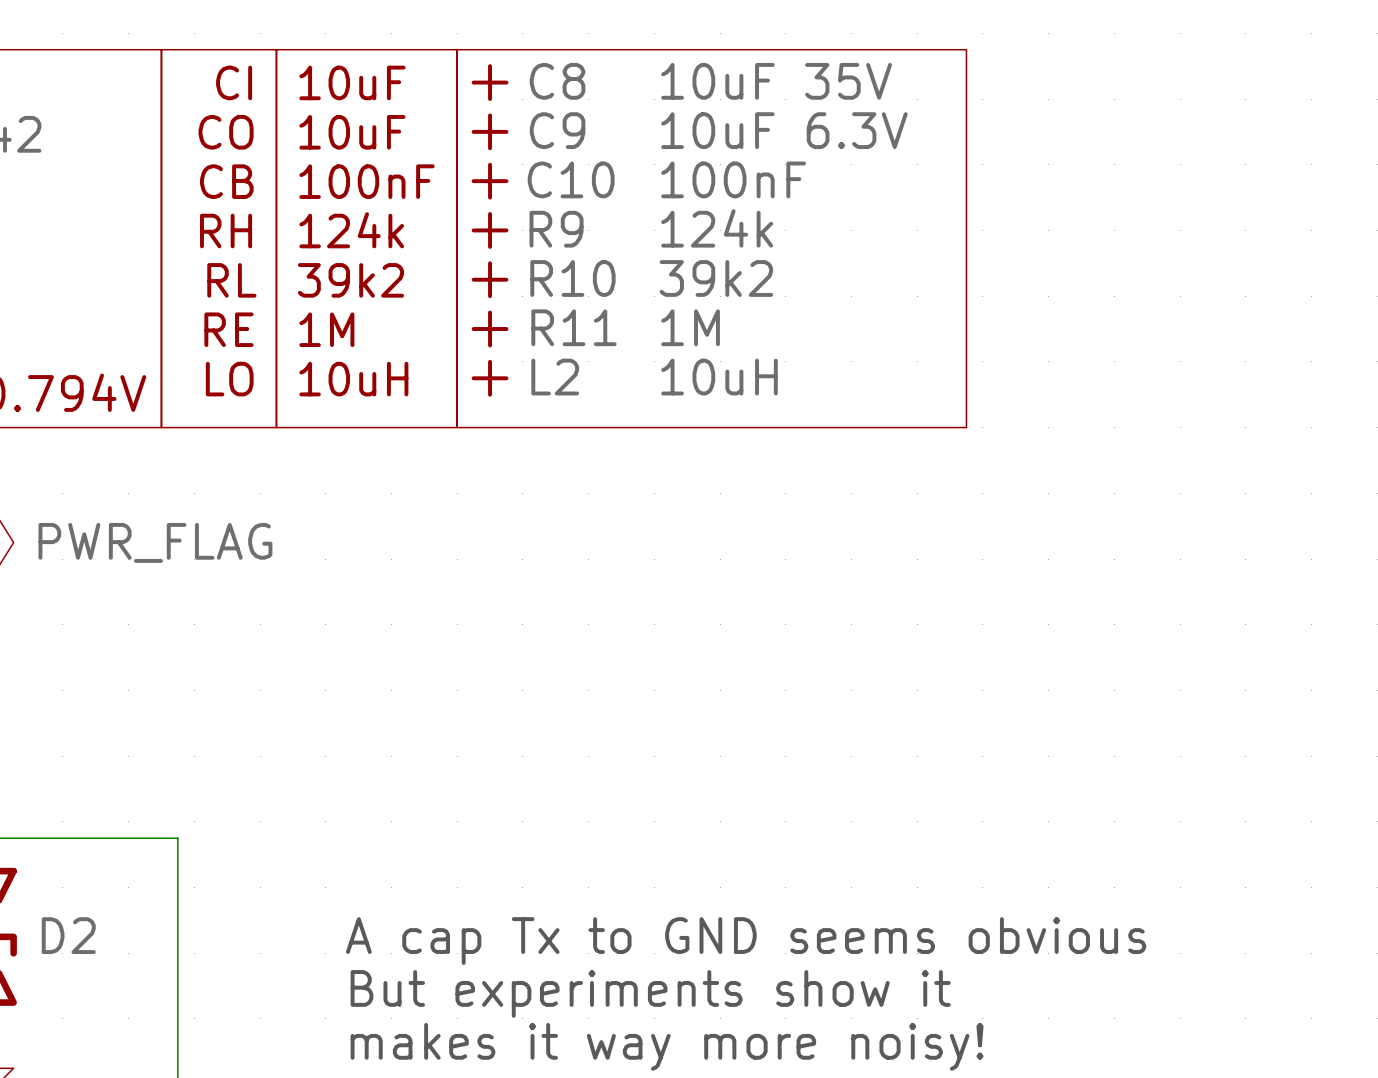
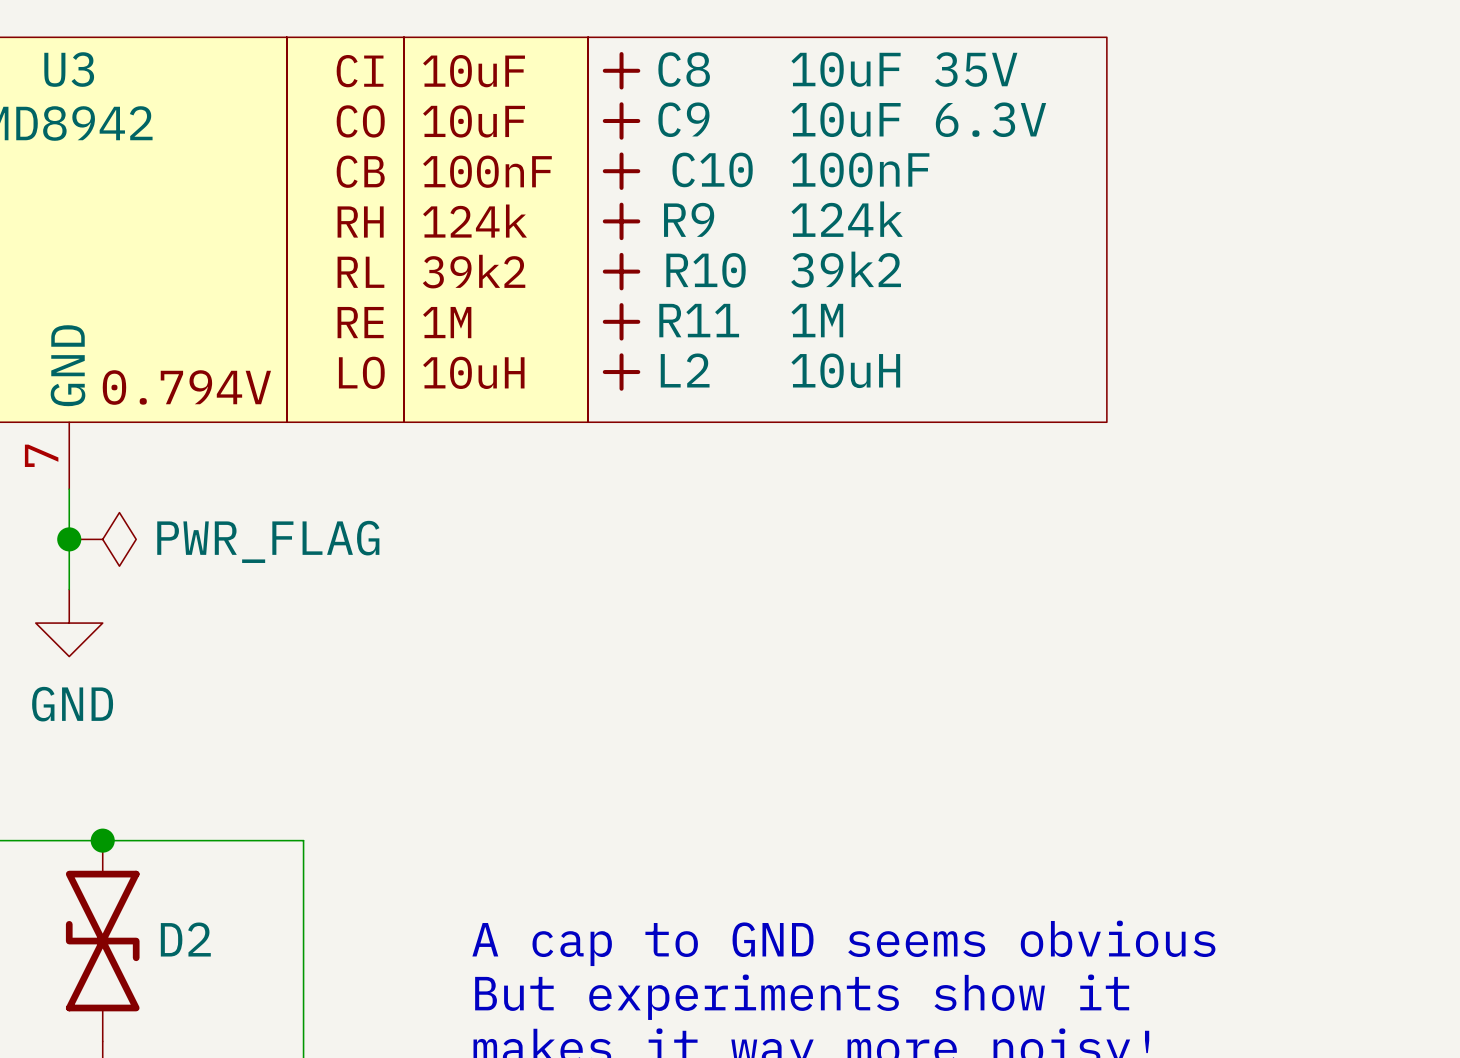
text: A cap Tx to GND seems obvious (746, 941) -> A cap to GND seems obvious (843, 943)

